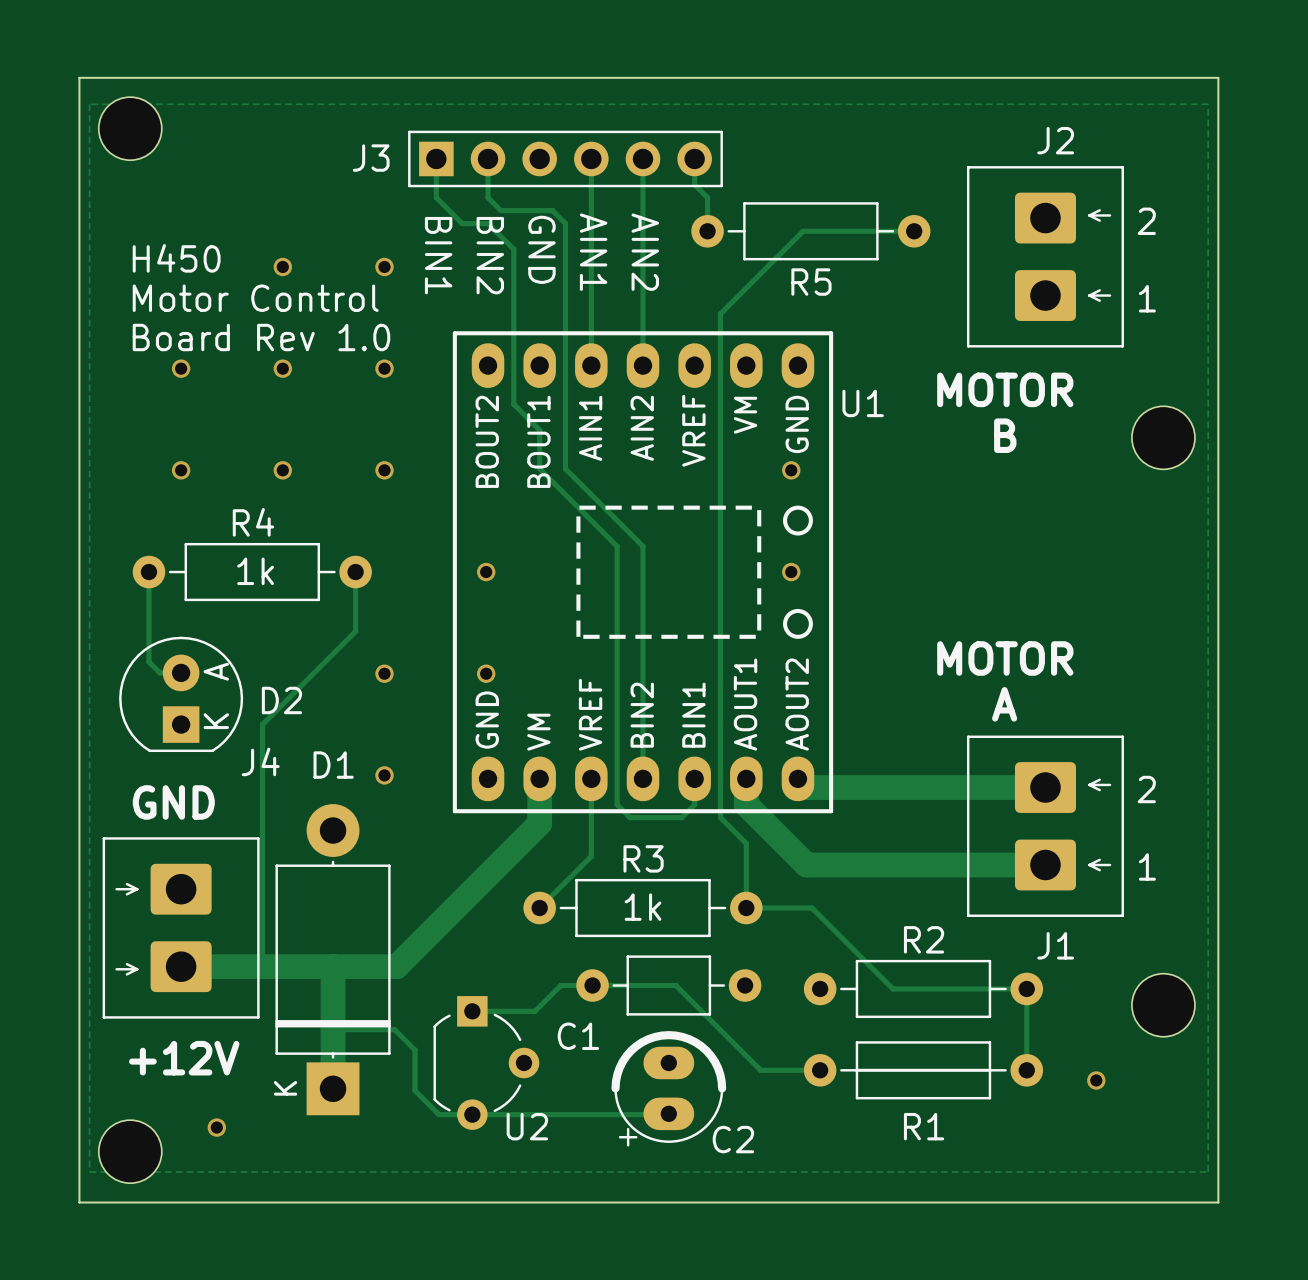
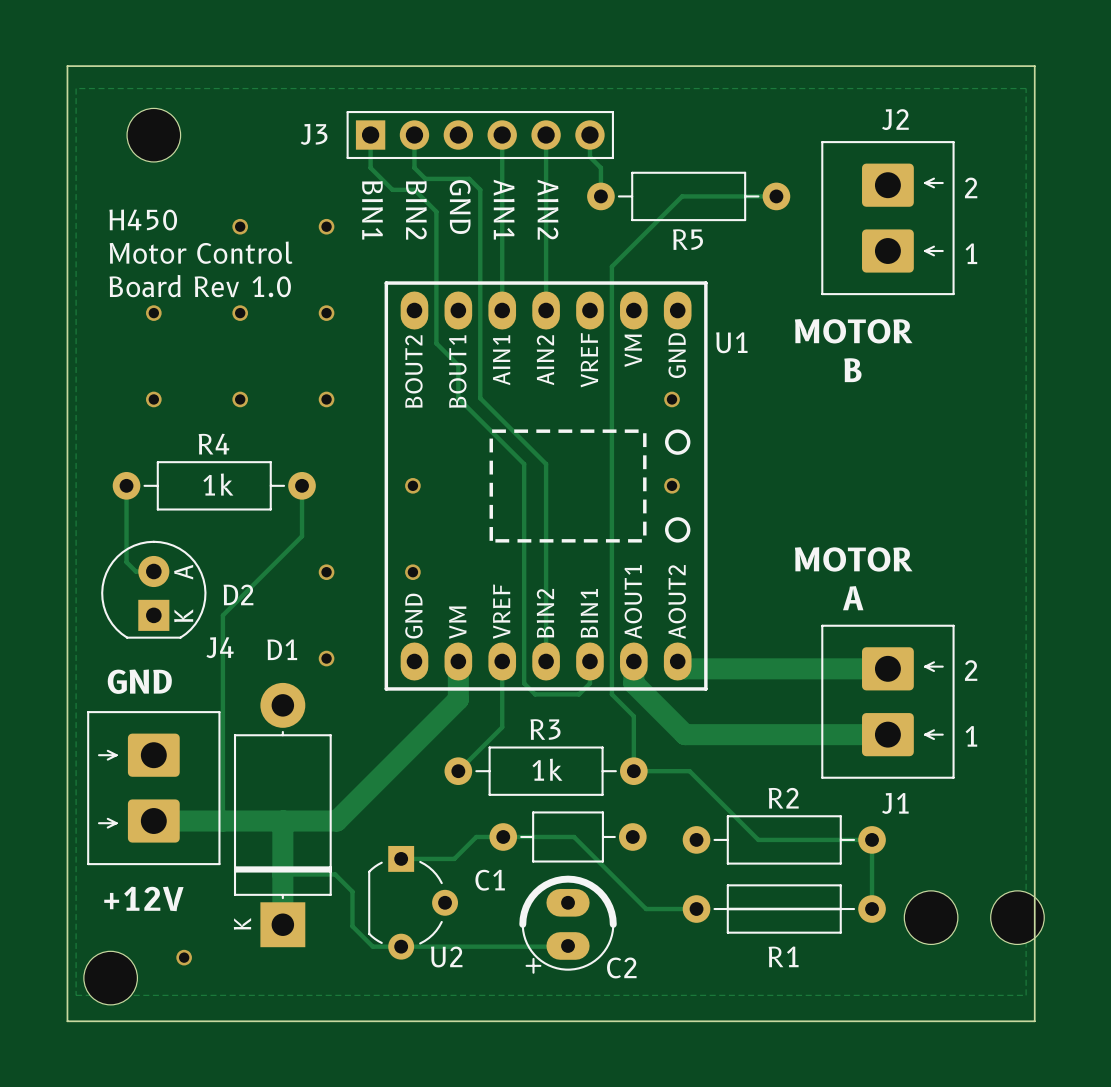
part position: (130, 128) -> (153, 135)
part: (1163, 437) -> none
part: (1163, 1005) -> none
part: none -> (931, 917)
part: none -> (1017, 917)

